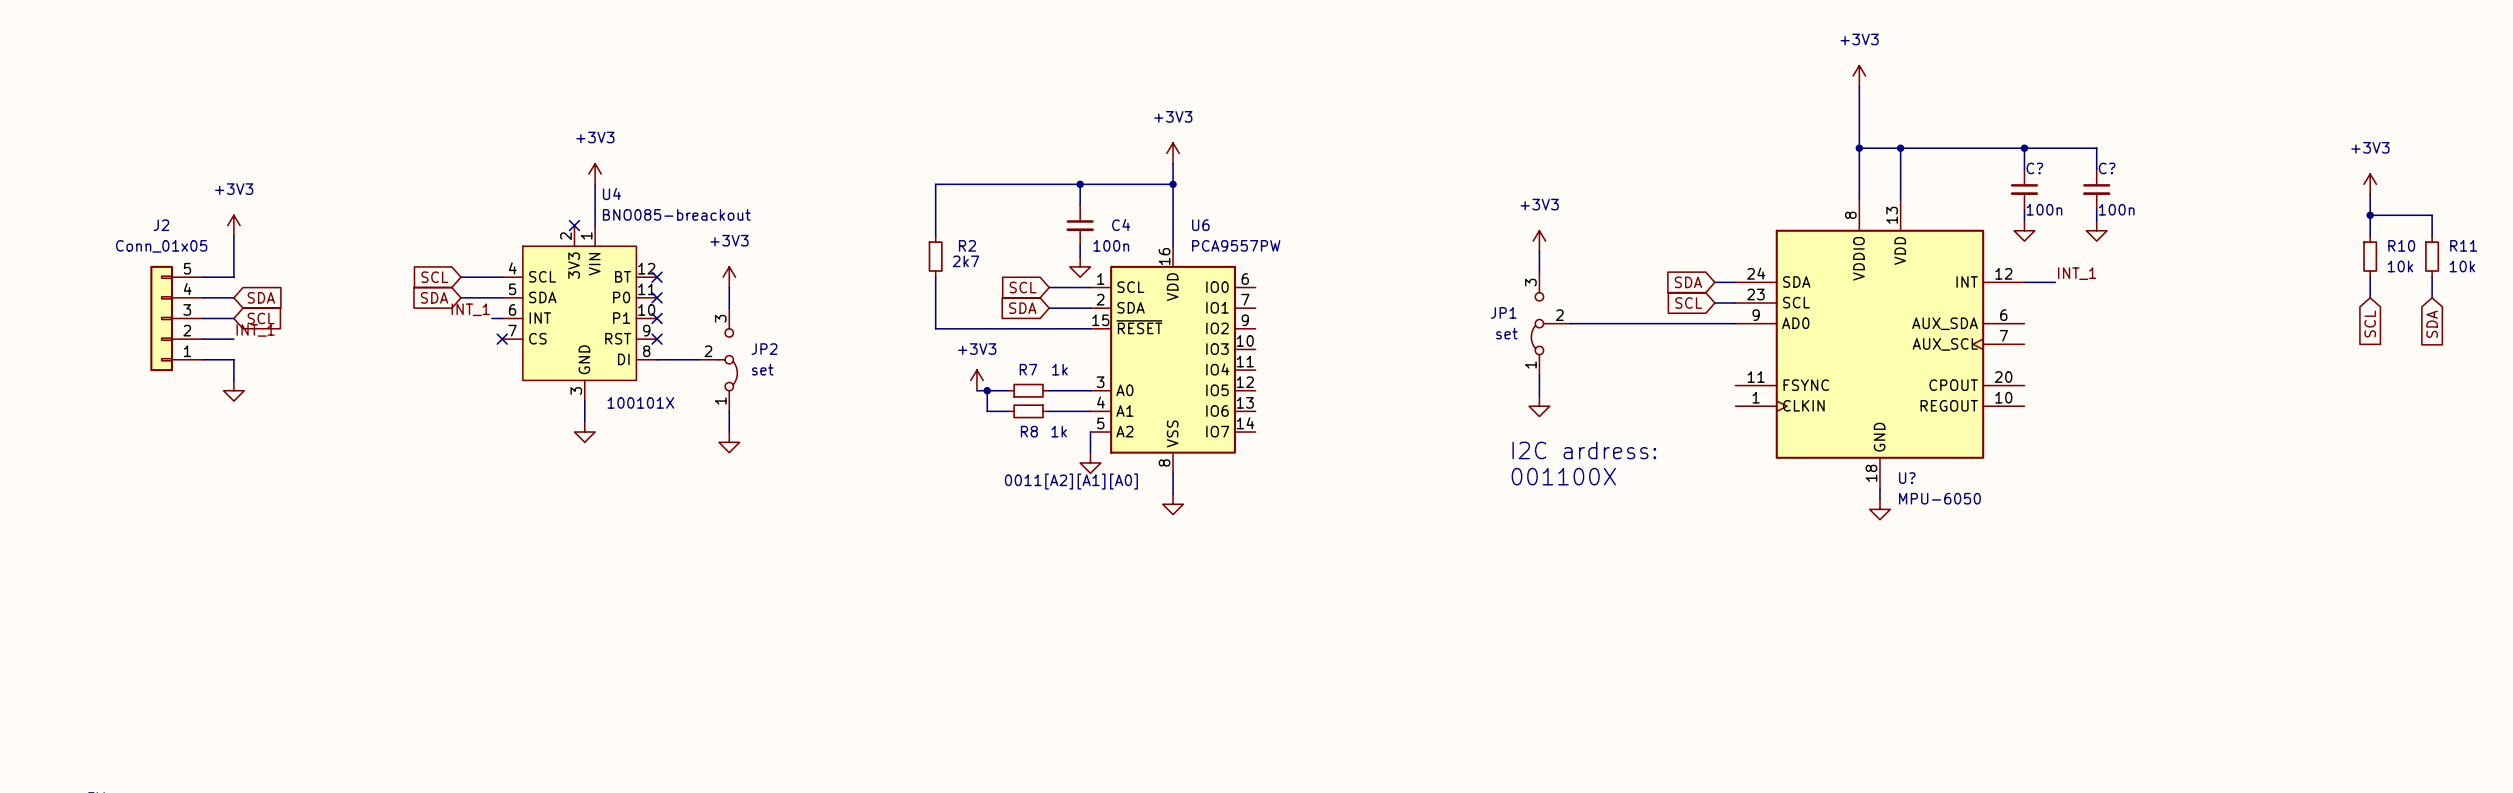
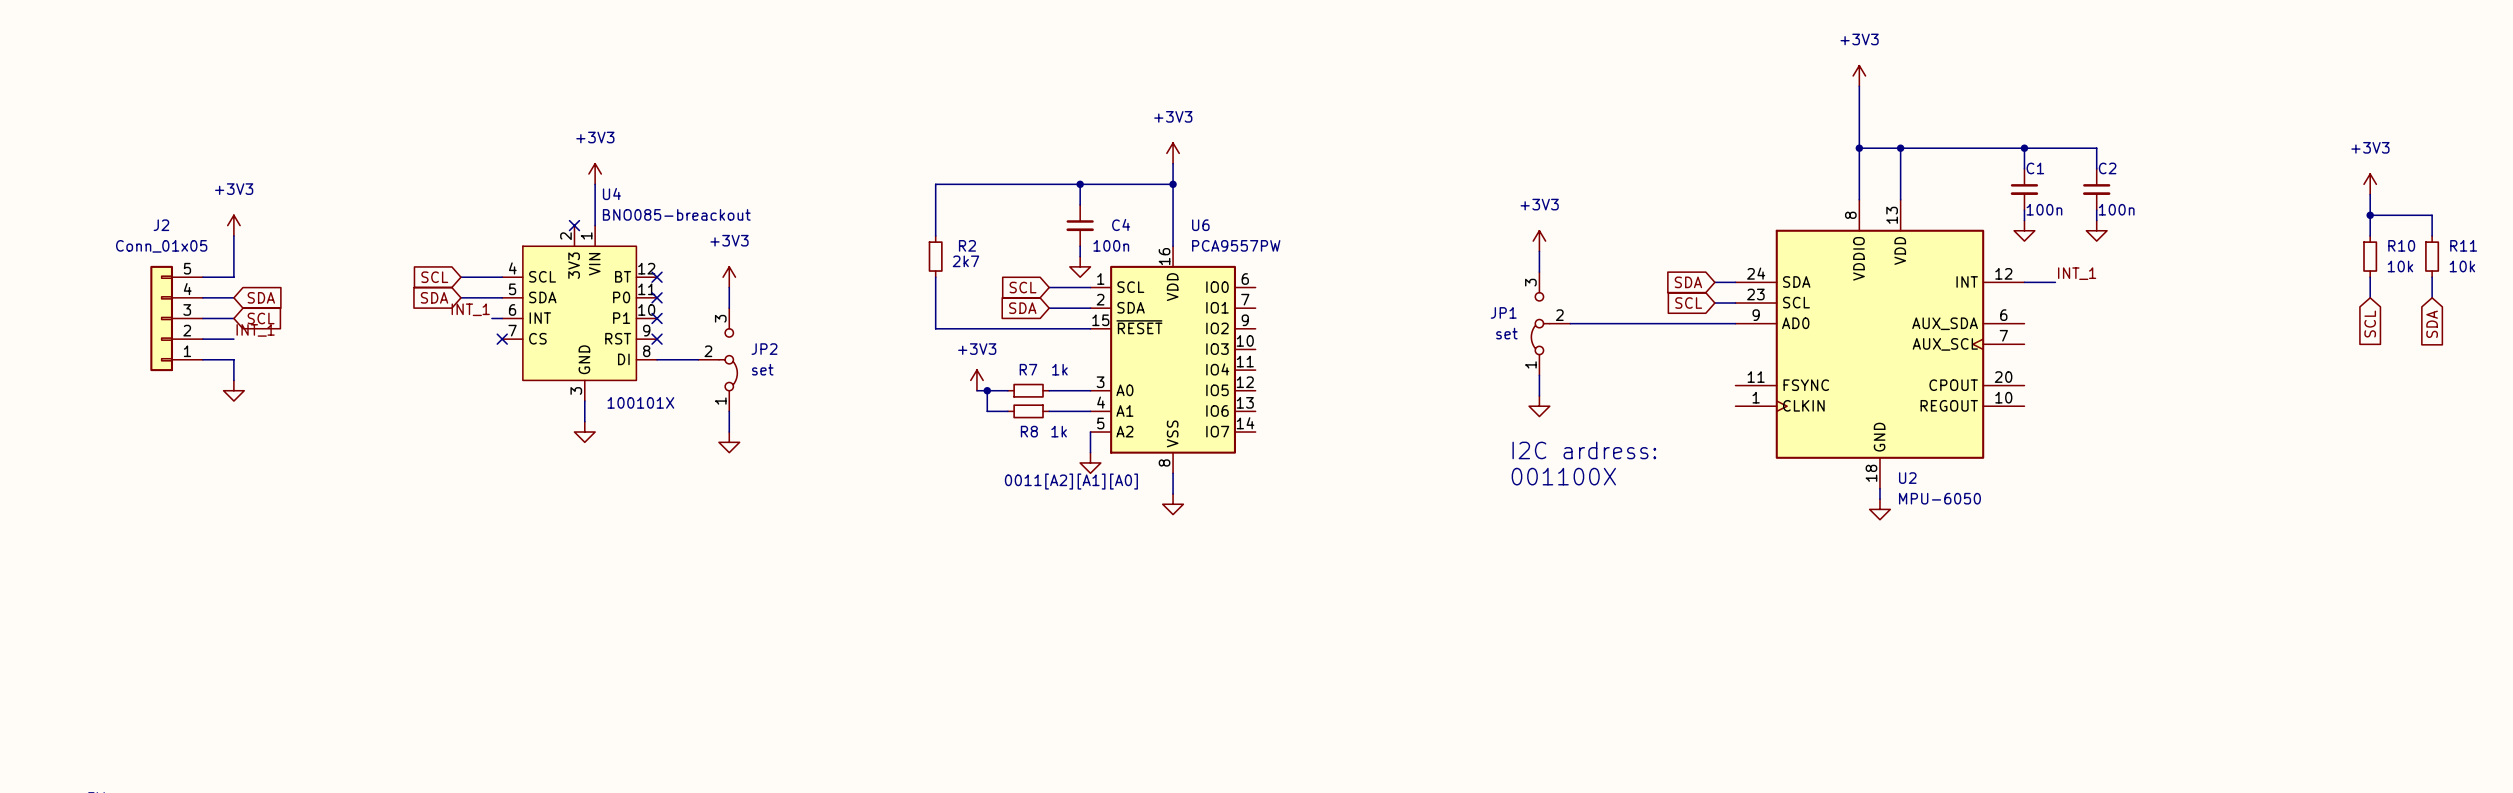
C? name: C? (2034, 168) -> C1 (2035, 168)
C? name: C? (2107, 168) -> C2 (2107, 168)
U? name: U? (1907, 478) -> U2 (1907, 478)

